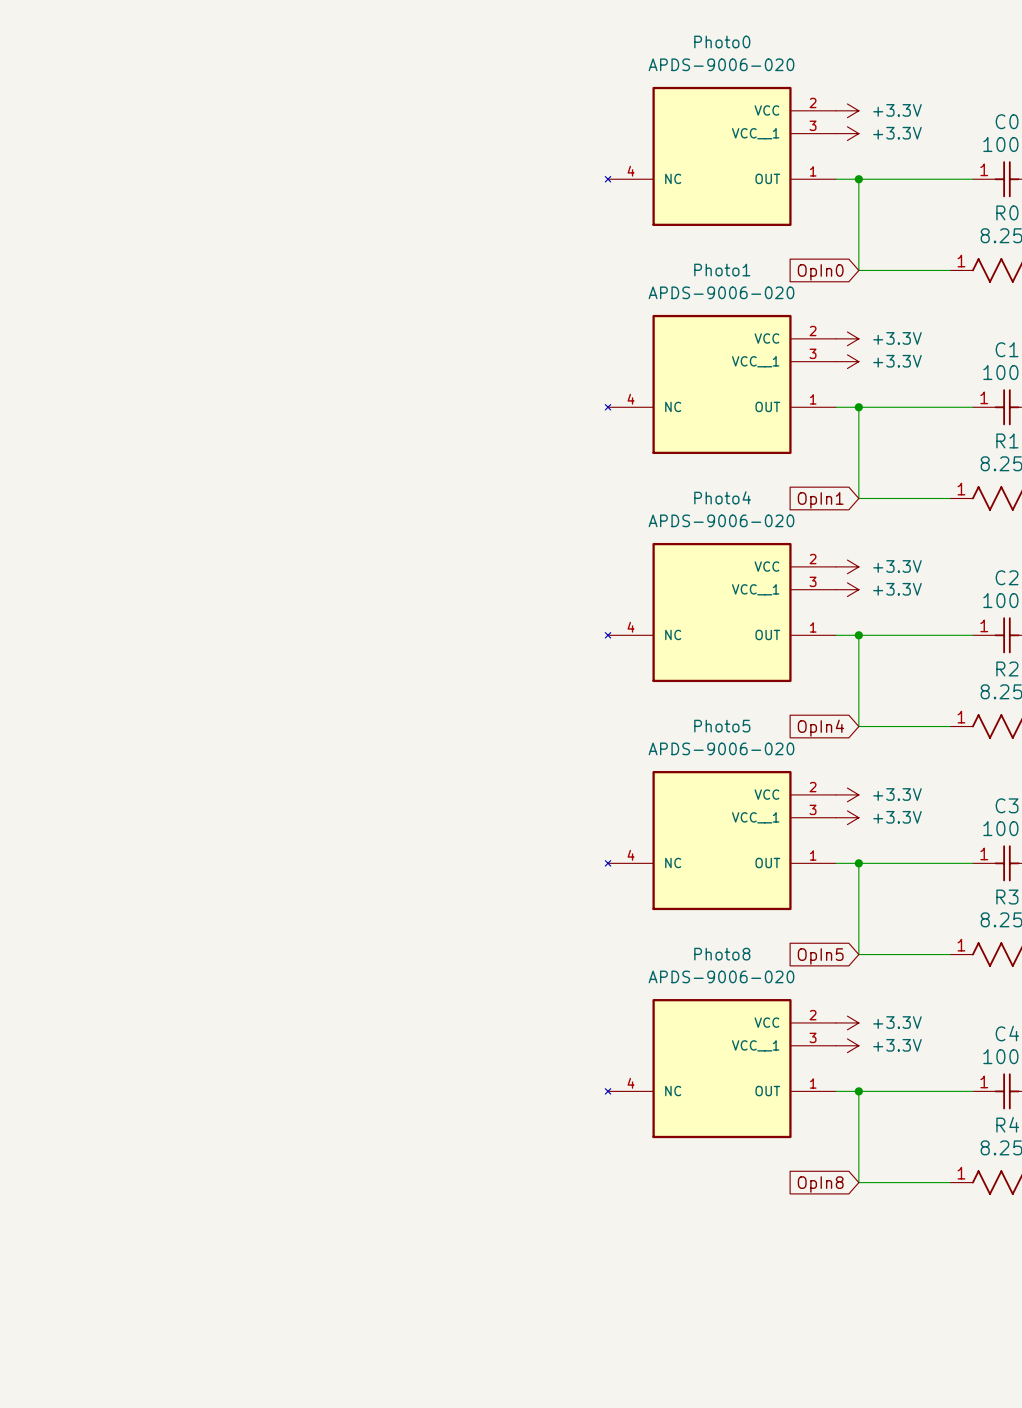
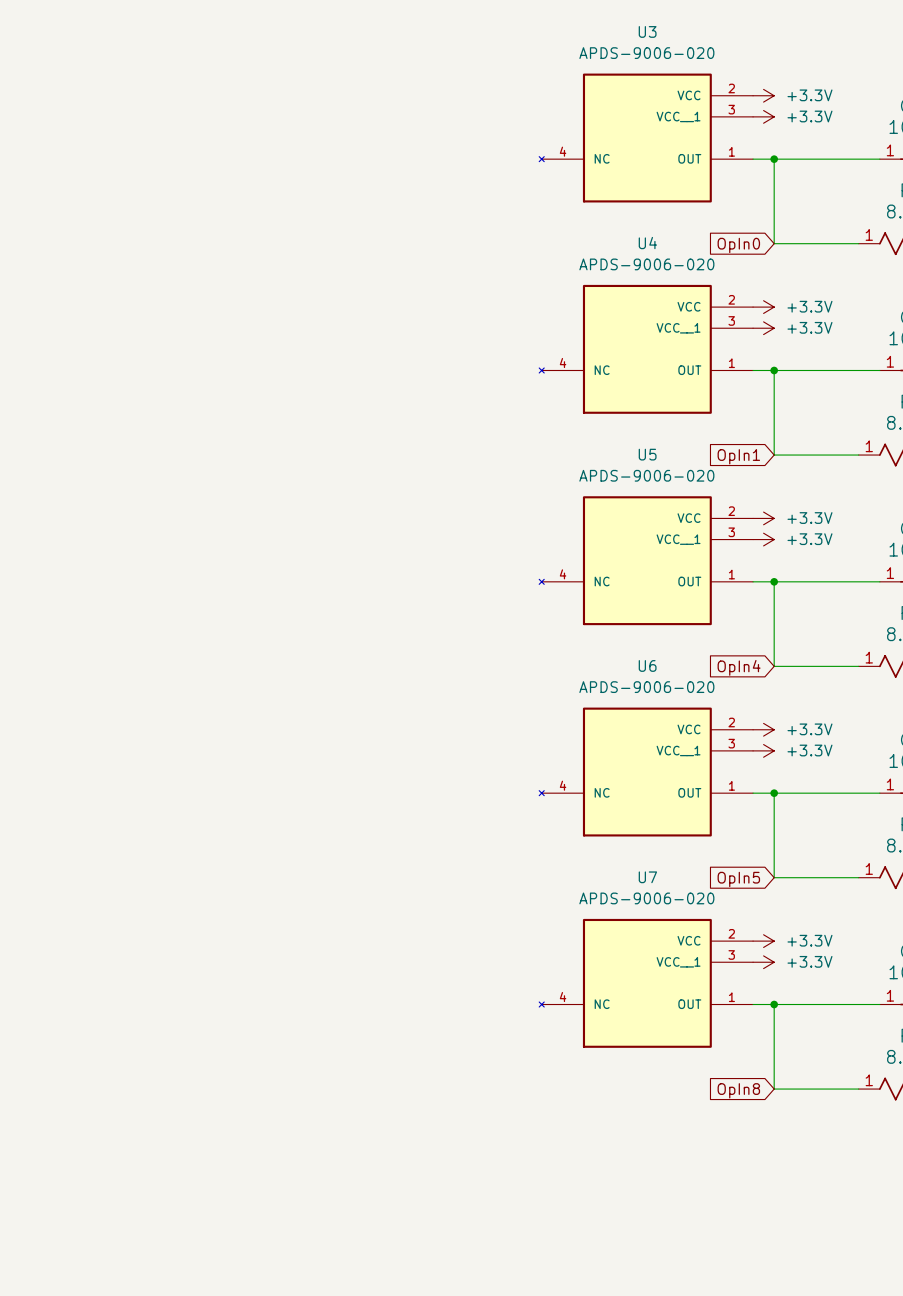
Photo0 name: Photo0 (722, 41) -> U3 (647, 31)
Photo1 name: Photo1 (722, 270) -> U4 (647, 243)
Photo4 name: Photo4 (722, 497) -> U5 (647, 454)
Photo5 name: Photo5 (722, 726) -> U6 (647, 665)
Photo8 name: Photo8 (722, 954) -> U7 (647, 877)

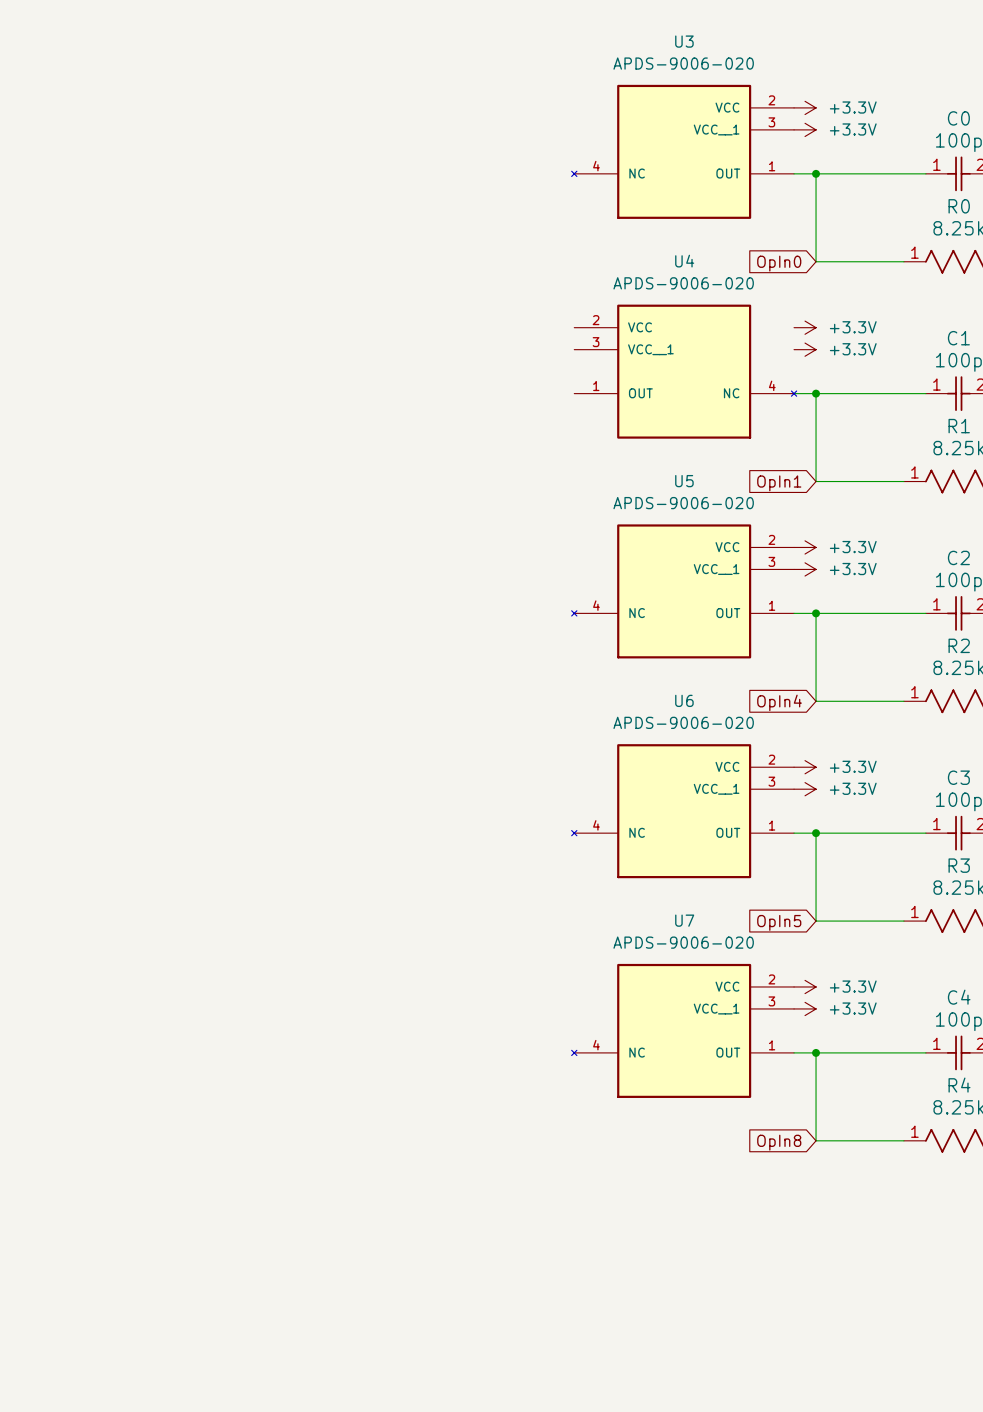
U4 flip: as is (625, 349) -> left-right (706, 371)

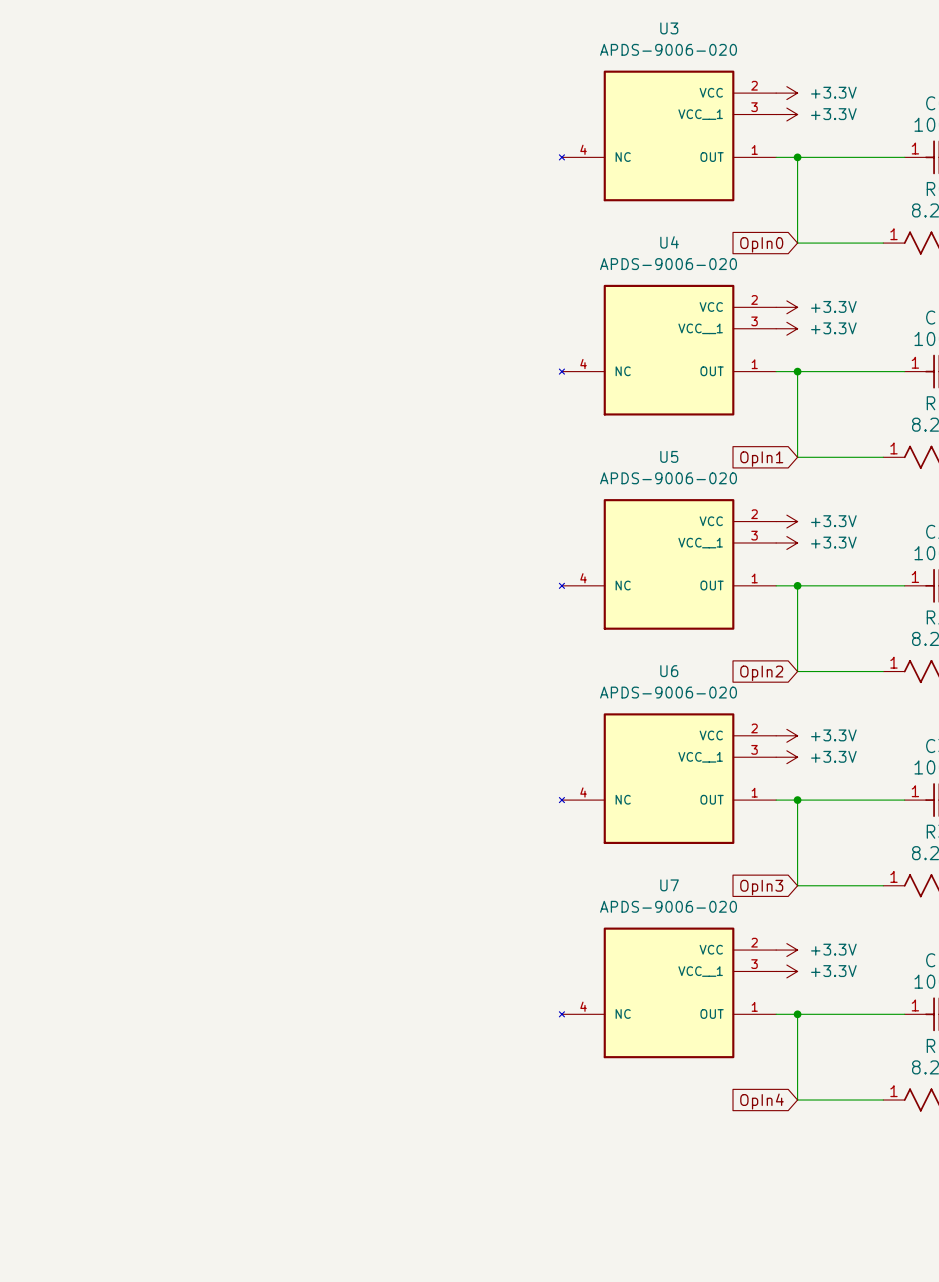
U4 flip: as is (706, 371) -> left-right (646, 350)
global label: OpIn4 (779, 702) -> OpIn2 (761, 673)
global label: OpIn5 (779, 922) -> OpIn3 (761, 887)
global label: OpIn8 (779, 1142) -> OpIn4 (761, 1101)

